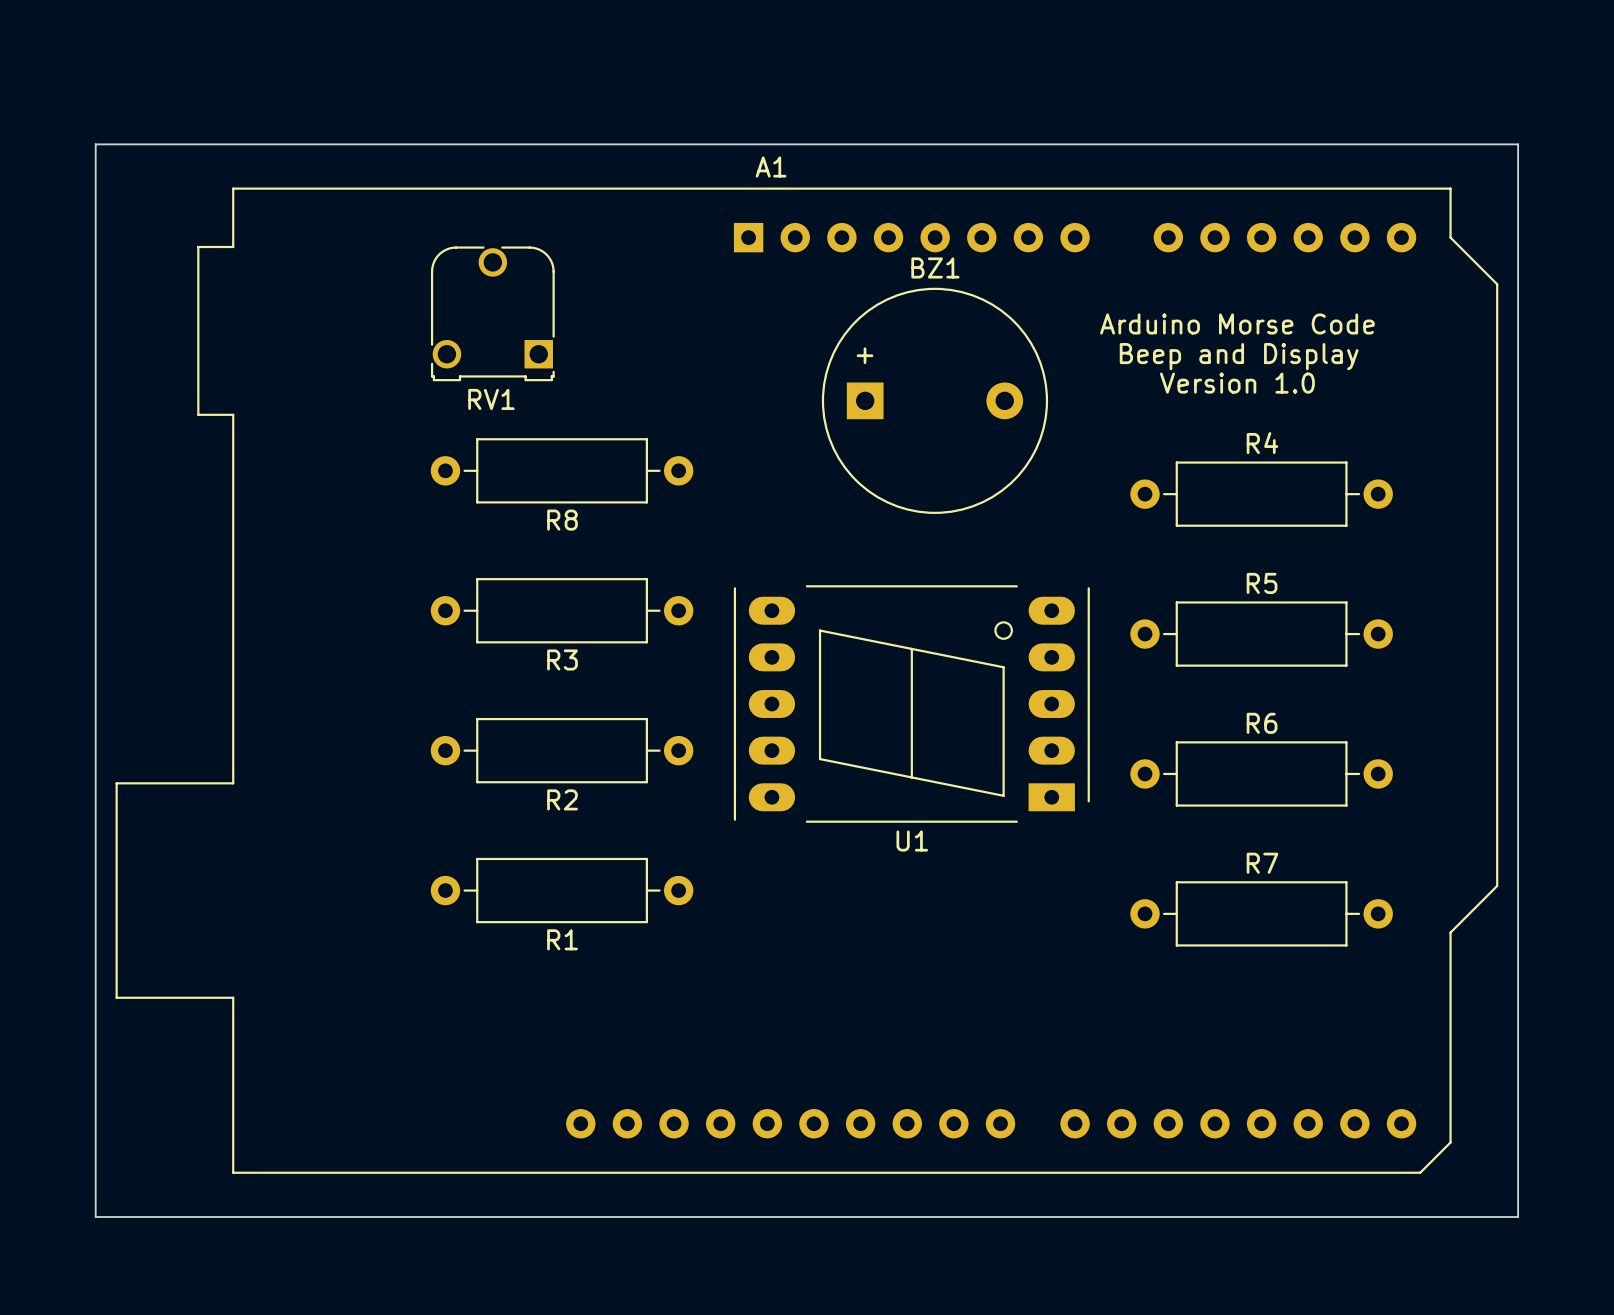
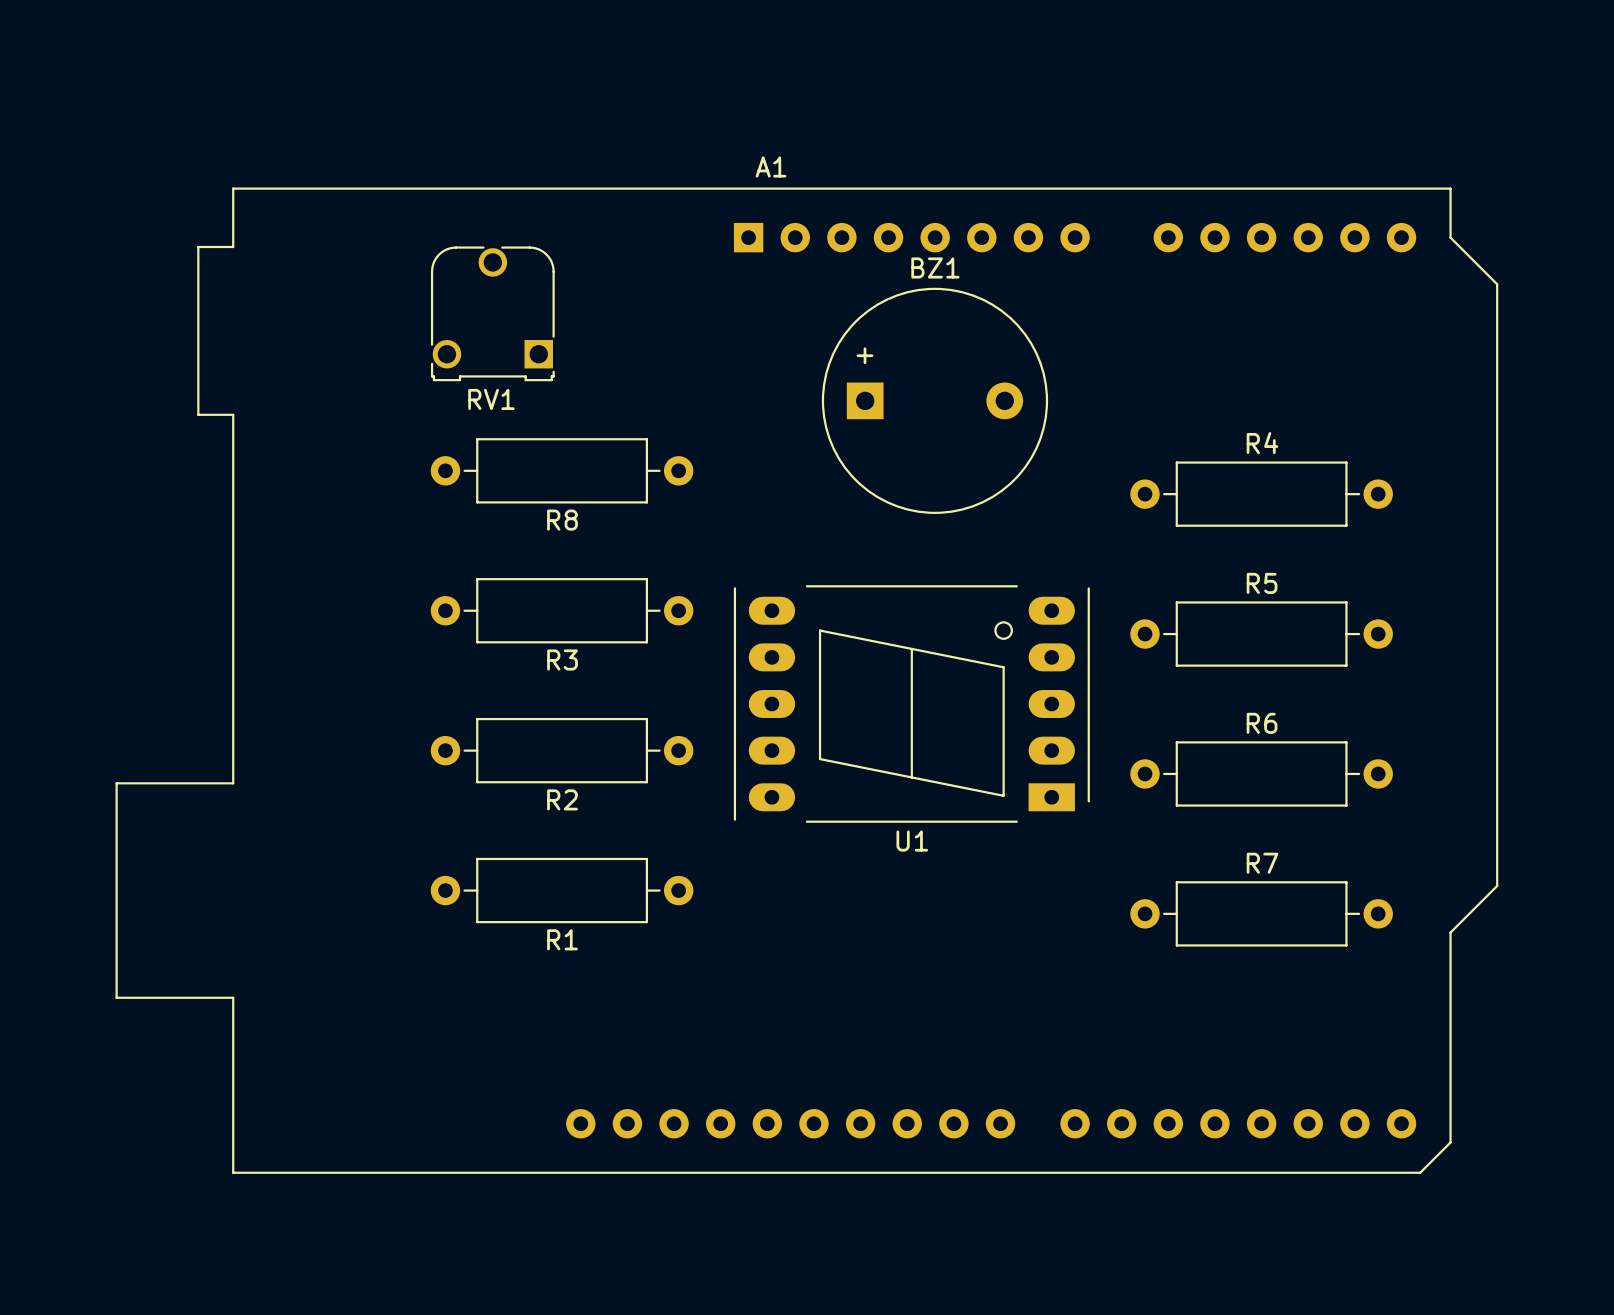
board edge: (95, 144) (1518, 144) (1518, 1217) (95, 1217) (95, 144) -> none
text: Arduino Morse Code (1237, 323) -> none
text: Beep and Display (1239, 356) -> none
text: Version 1.0 (1237, 383) -> none

